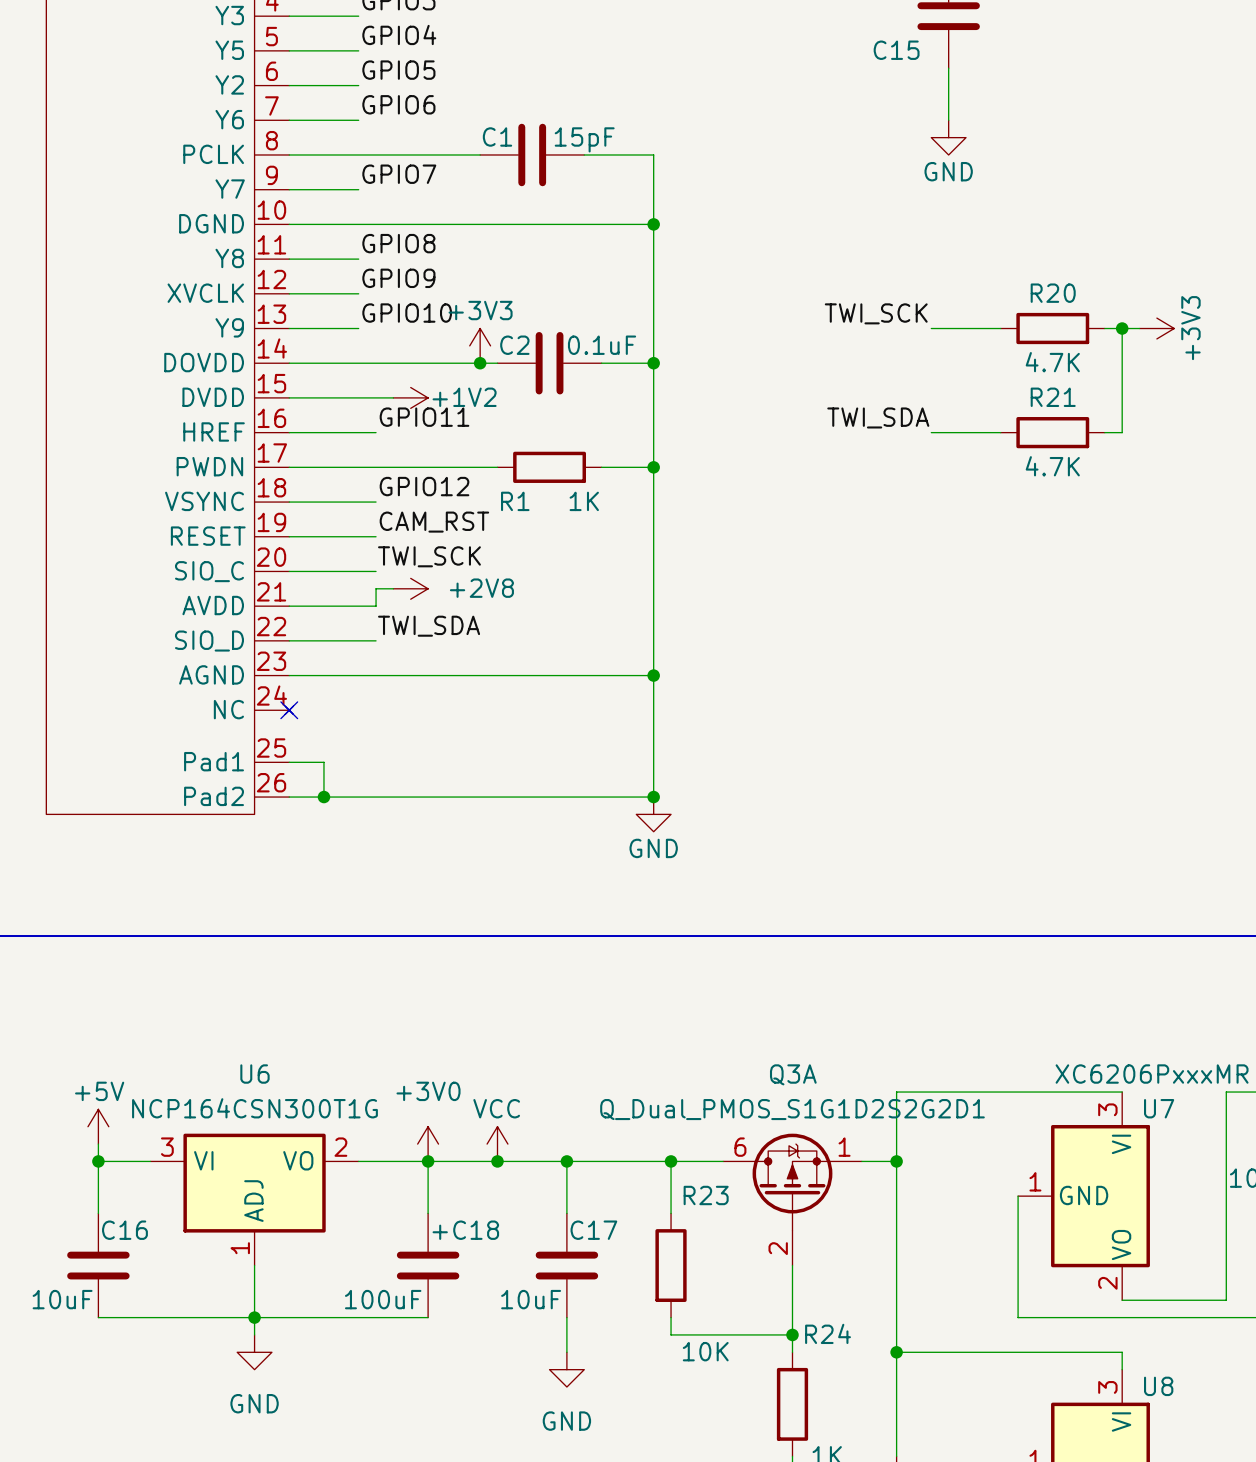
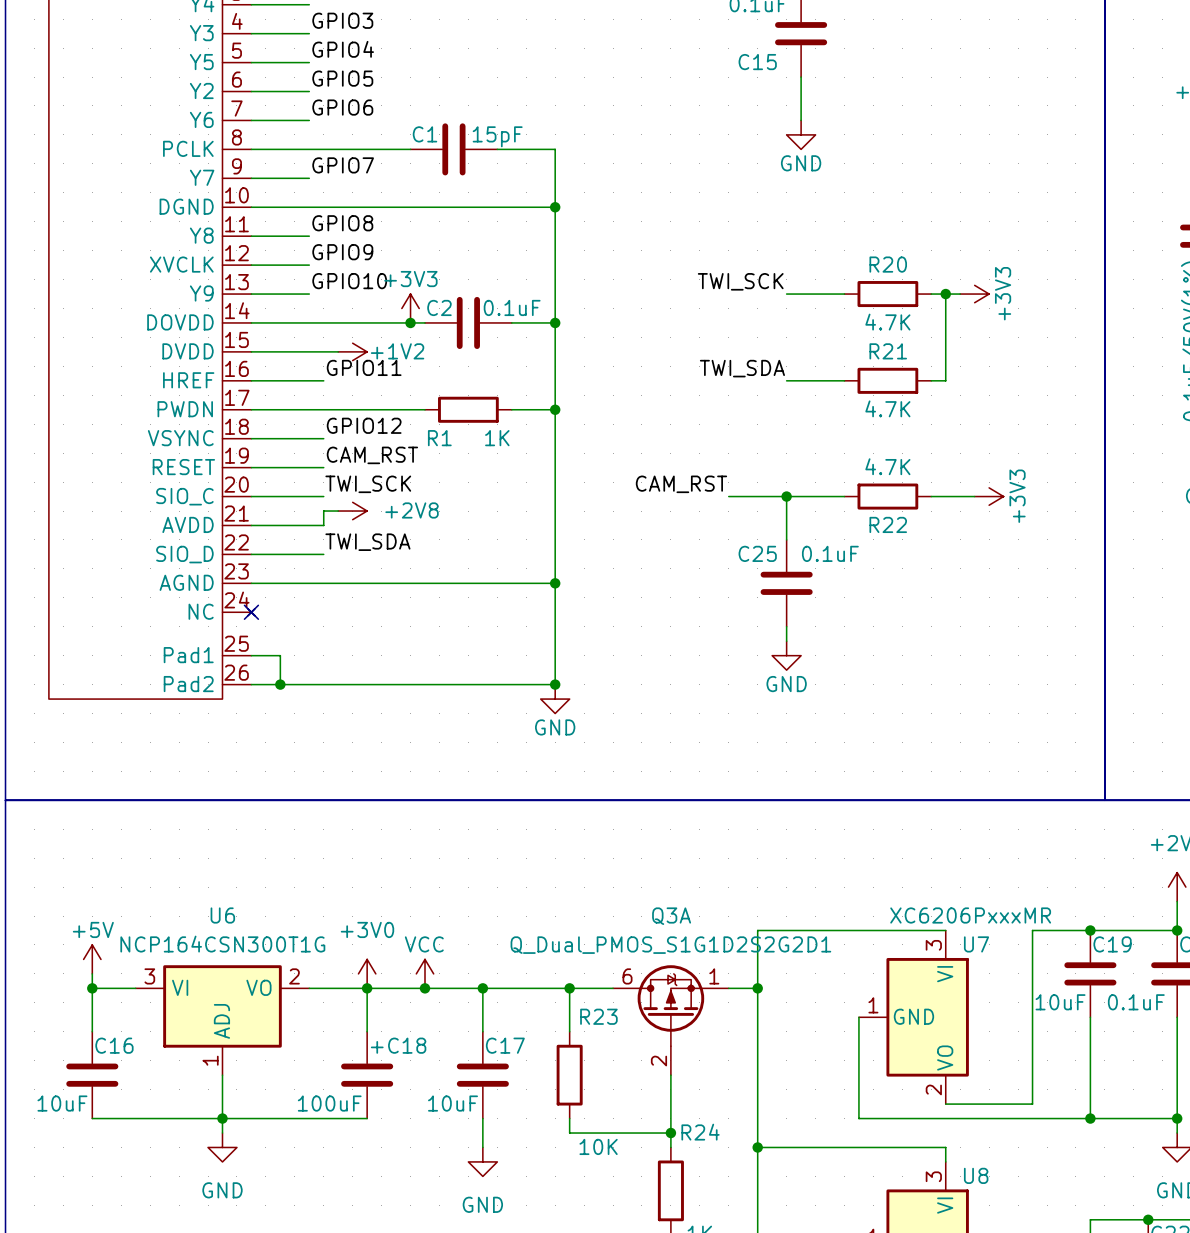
label: none -> CAM_RST (681, 484)
wire: none -> (728, 496) (844, 496)
wire: none -> (786, 496) (786, 539)
junction: none -> (786, 496)
R22: none -> 4.7K (887, 496)
wire: none -> (931, 496) (974, 496)
power symbol: none -> +3V3 (989, 496)
C25: none -> 0.1uF (786, 583)
wire: none -> (786, 626) (786, 641)
power symbol: none -> GND (786, 655)

